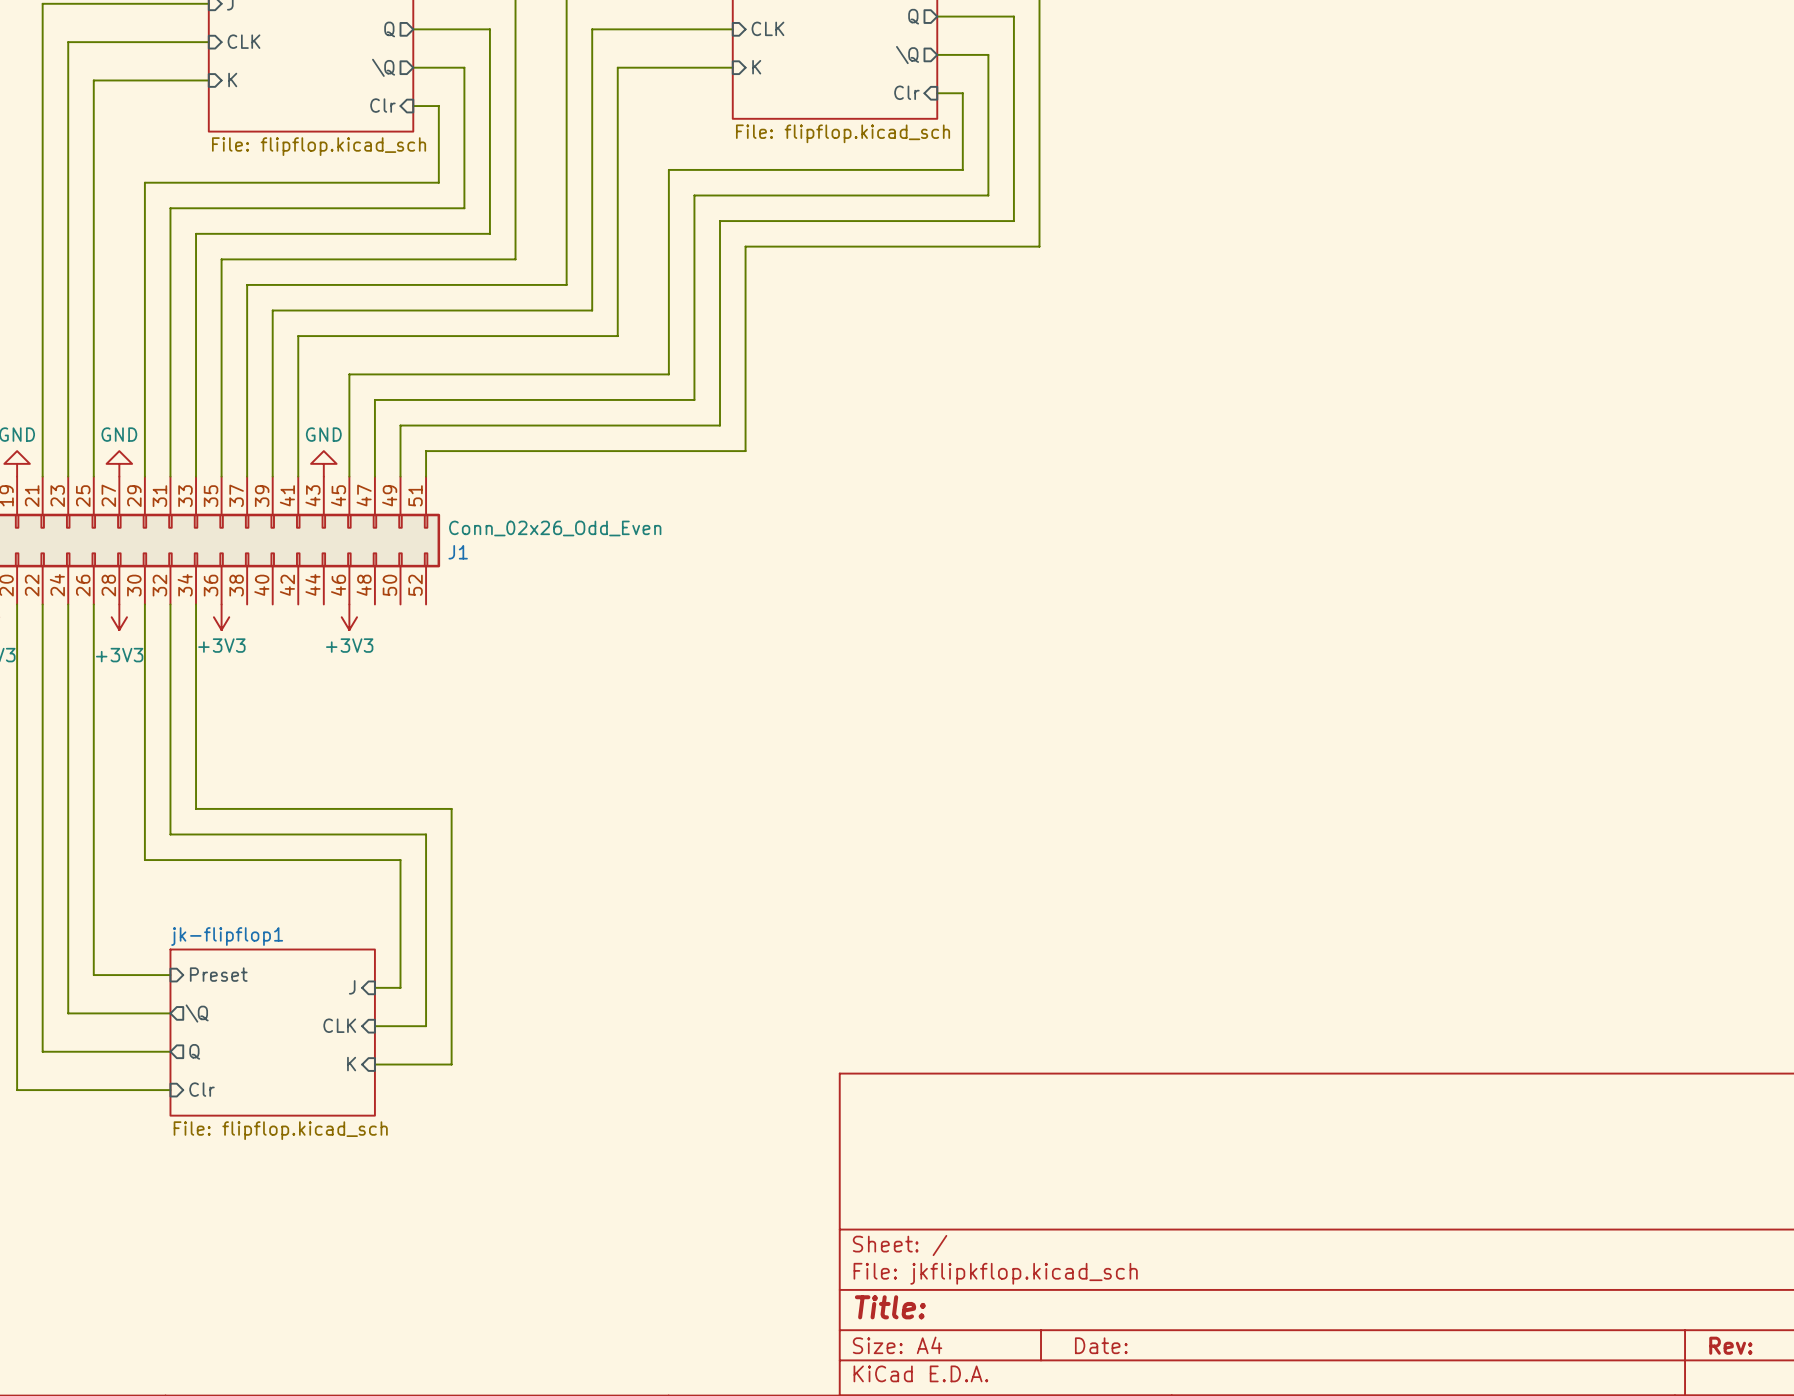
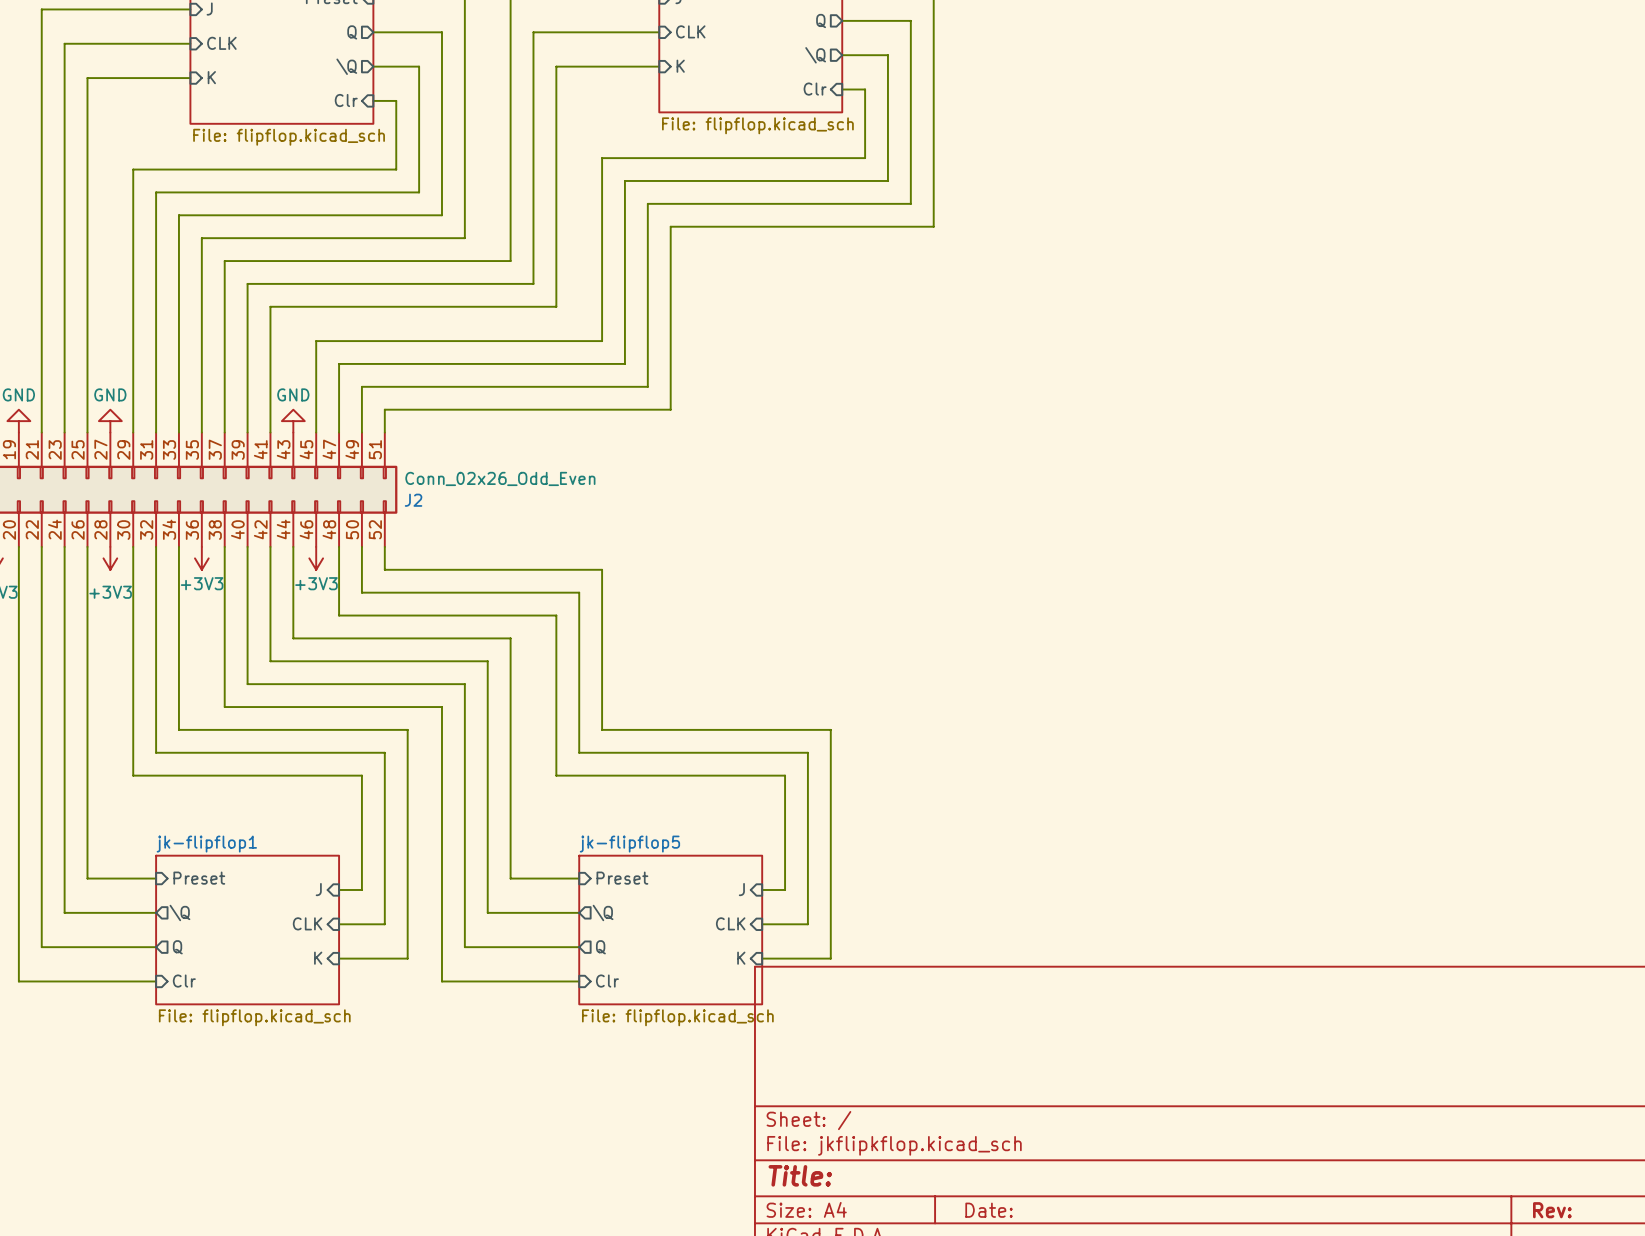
J1 name: J1 (458, 552) -> J2 (413, 500)
wire: none -> (224, 546) (224, 707) (441, 707) (441, 981) (579, 981)
wire: none -> (247, 546) (247, 684) (464, 684) (464, 947) (579, 947)
wire: none -> (270, 546) (270, 661) (487, 661) (487, 912) (579, 912)
wire: none -> (293, 546) (293, 638) (510, 638) (510, 878) (579, 878)
wire: none -> (339, 546) (339, 615) (556, 615) (556, 775) (785, 775) (785, 889) (762, 889)
wire: none -> (361, 546) (361, 592) (579, 592) (579, 752) (807, 752) (807, 924) (762, 924)
wire: none -> (384, 546) (384, 569) (602, 569) (602, 729) (830, 729) (830, 958) (762, 958)
sheet pin: none -> Preset (622, 878)
sheet pin: none -> J (741, 889)
sheet pin: none -> \Q (603, 912)
sheet pin: none -> CLK (730, 923)
sheet jk-flipflop5: none -> File: flipflop.kicad_sch (670, 930)
sheet pin: none -> Q (600, 947)
sheet pin: none -> K (741, 958)
sheet pin: none -> Clr (607, 981)

